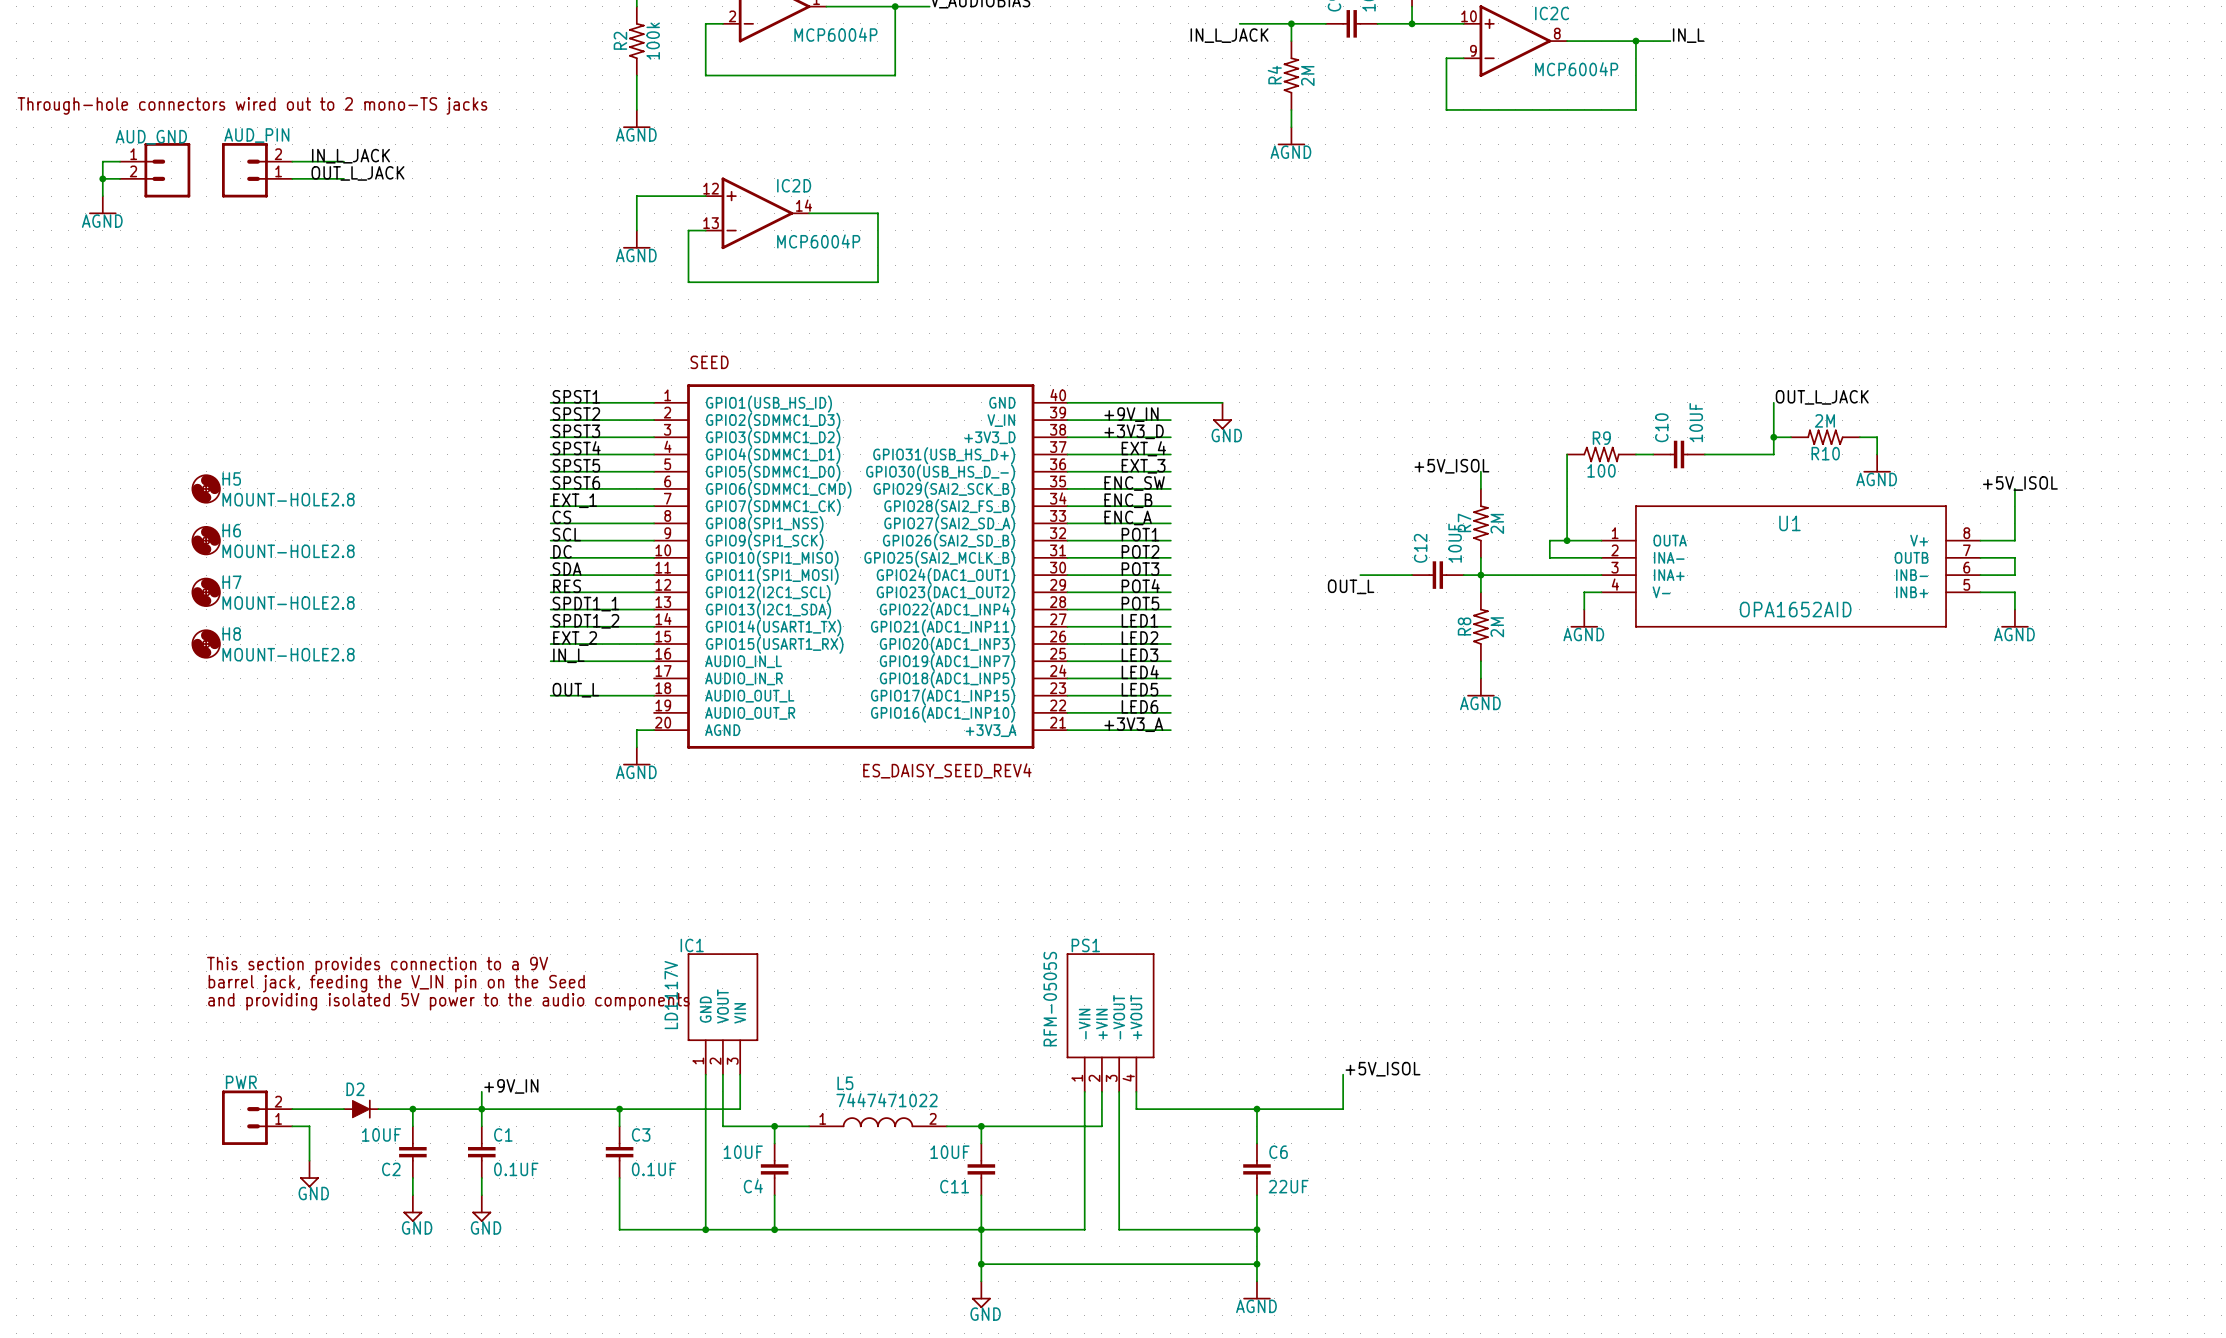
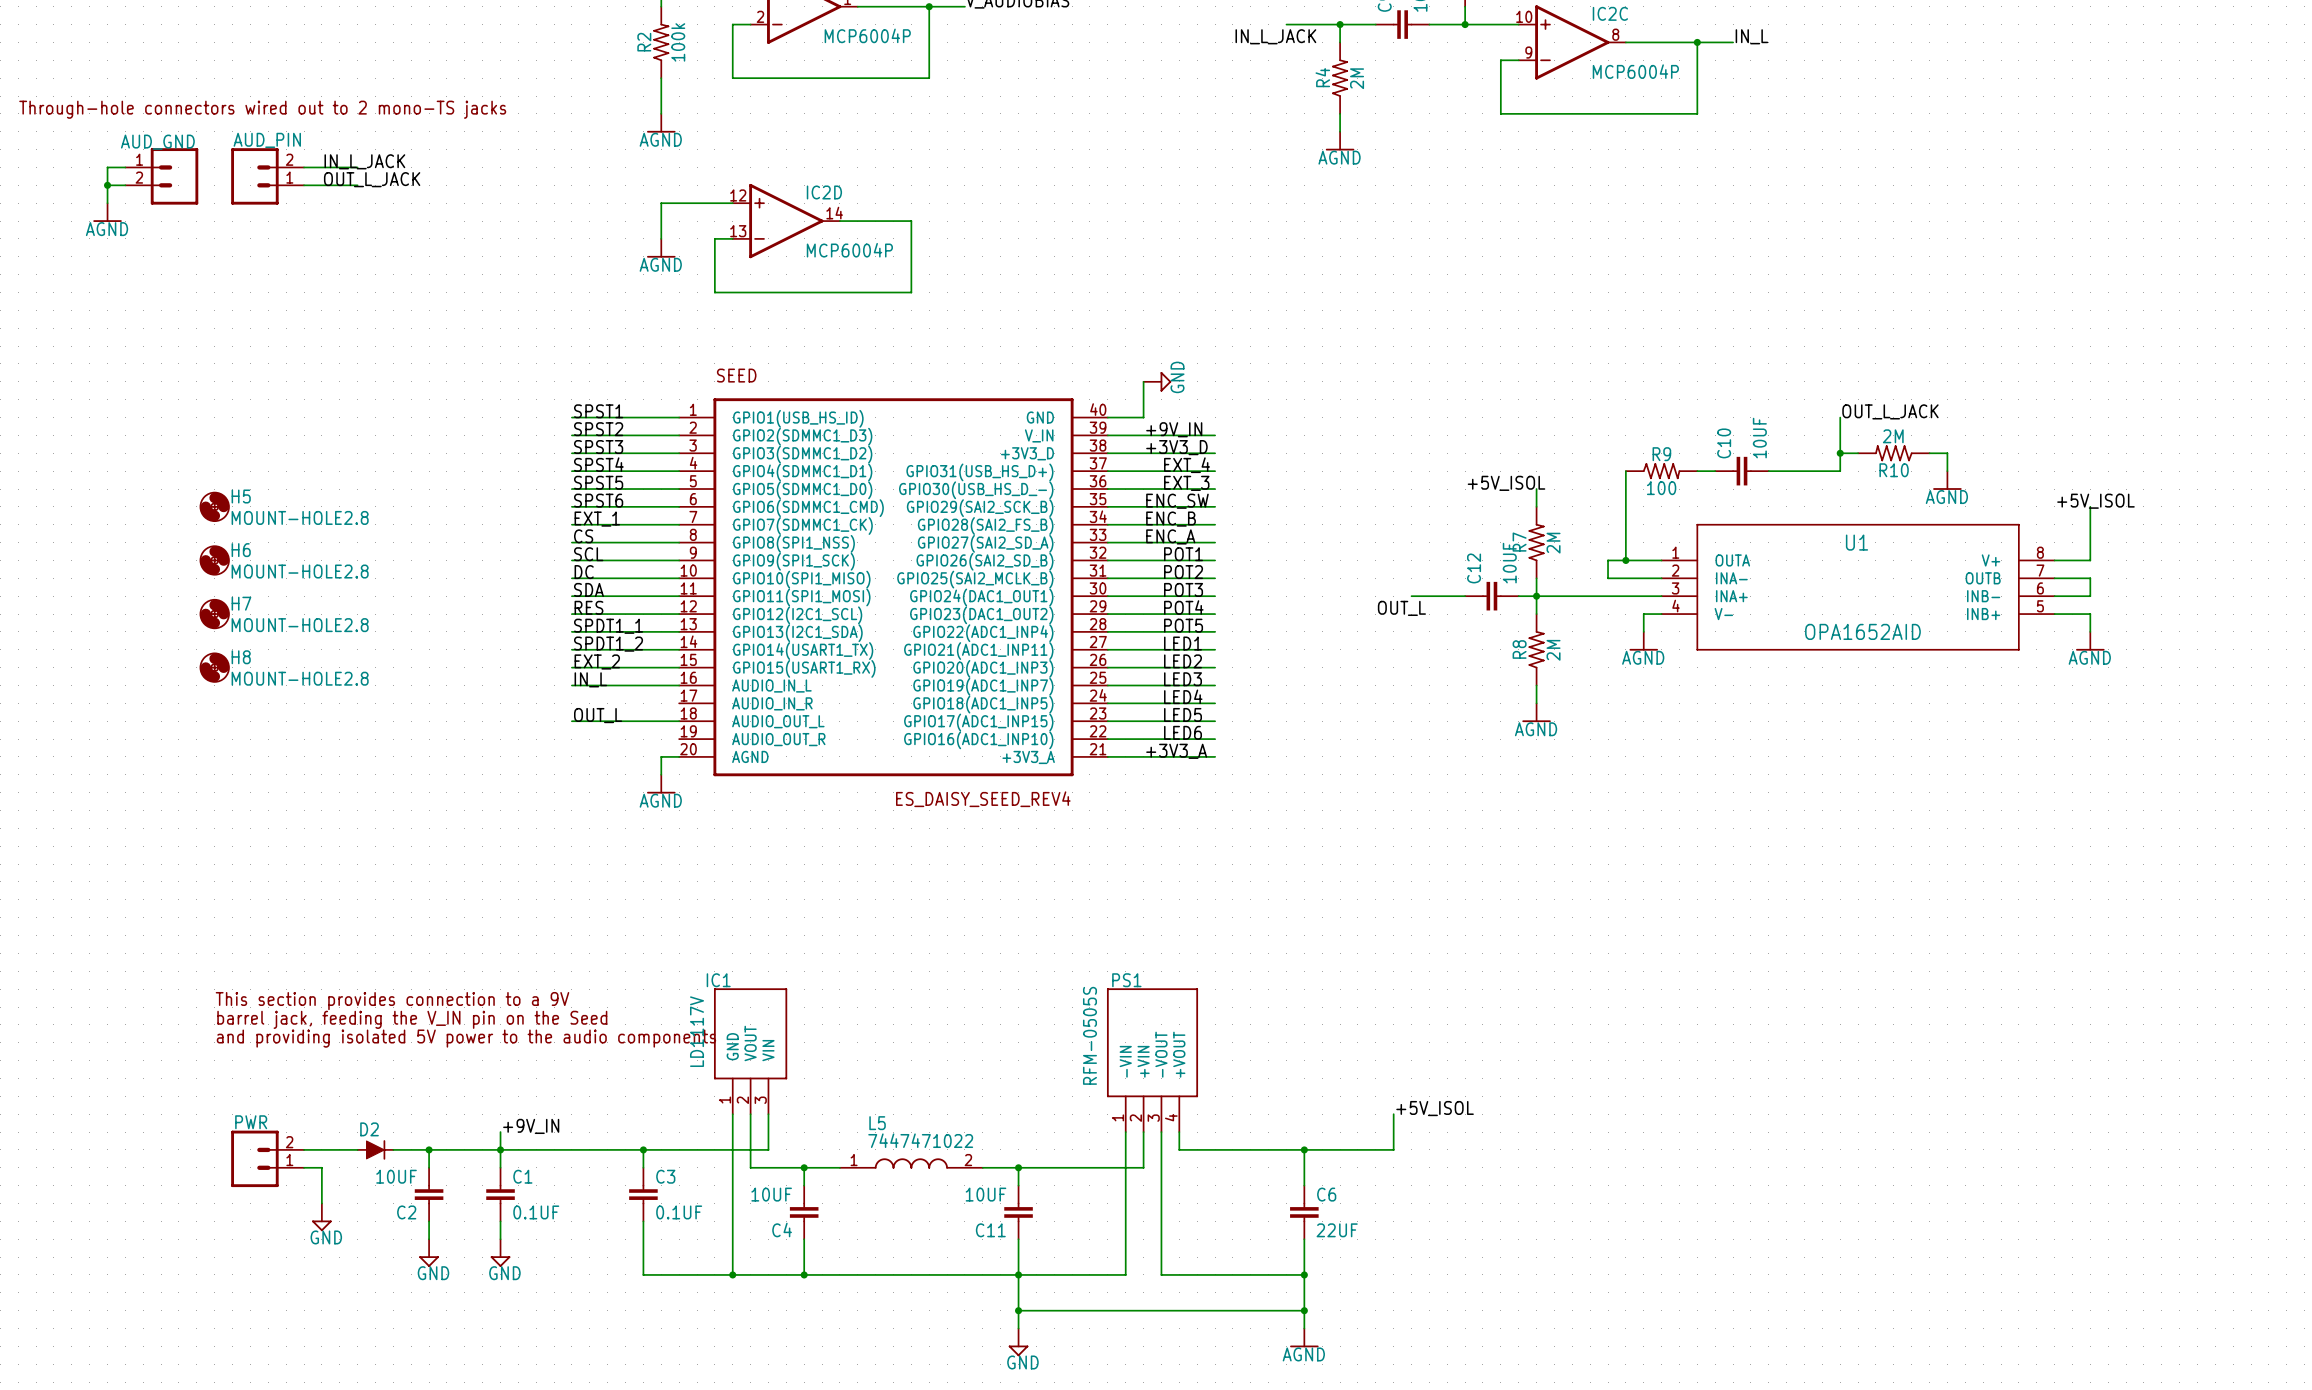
wire: (1101, 402) (1222, 402) -> (1143, 417) (1143, 381)
power symbol position: GND (1222, 416) -> GND (1157, 381)
power symbol rotation: 0° (1222, 424) -> 90° counterclockwise (1165, 381)

